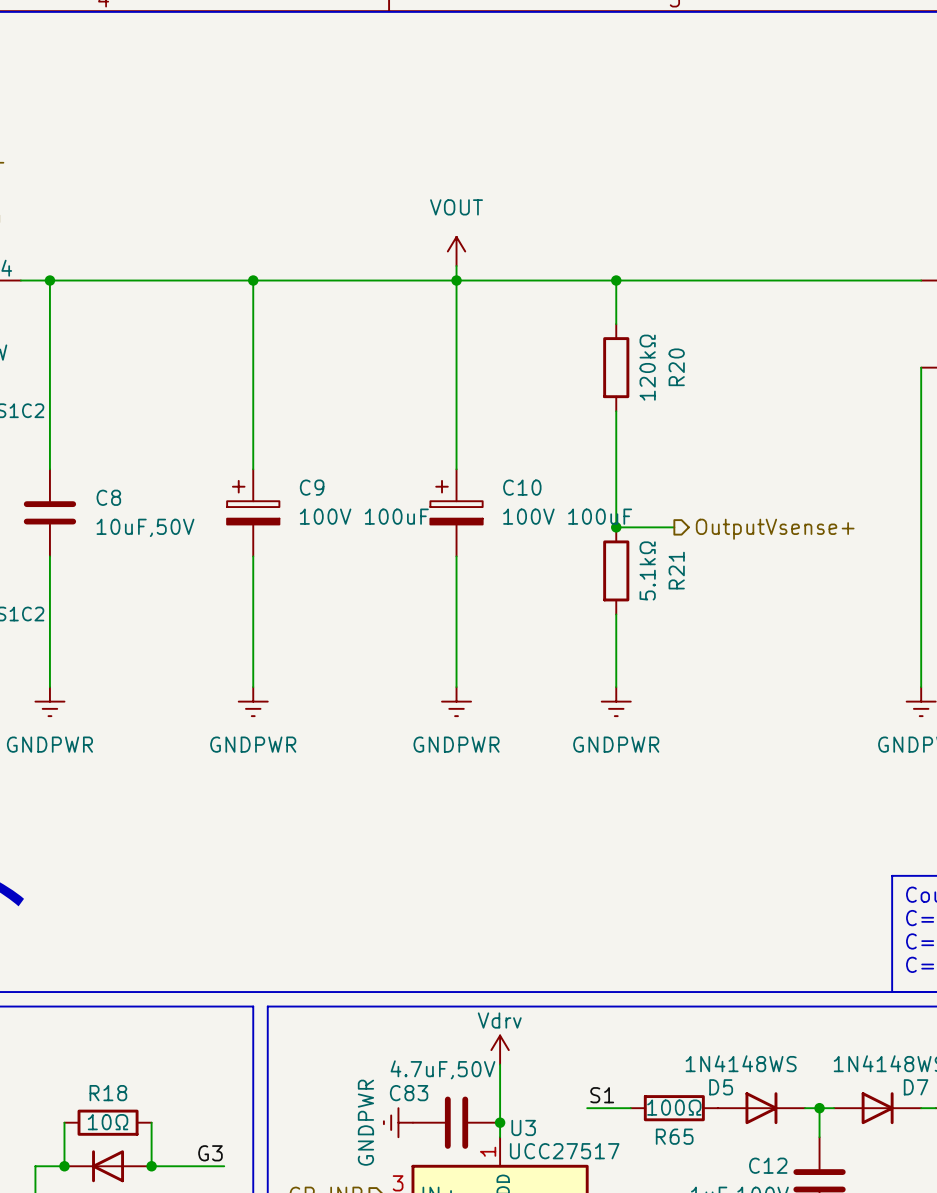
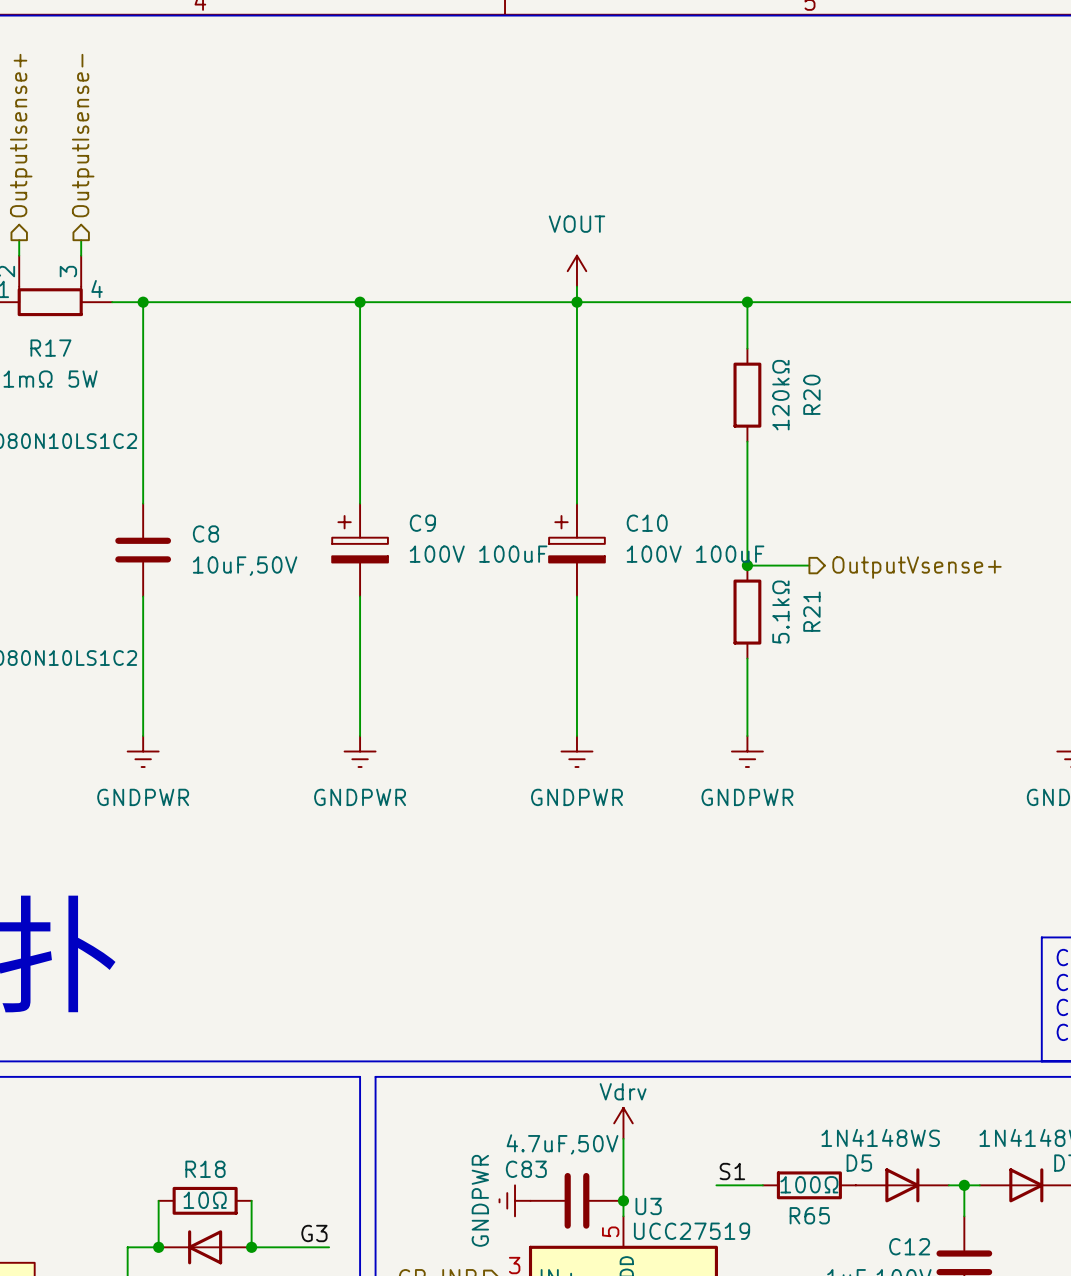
U3 pin number: 1 (488, 1151) -> 5 (610, 1231)
U3 value: UCC27517 (564, 1151) -> UCC27519 (692, 1231)

